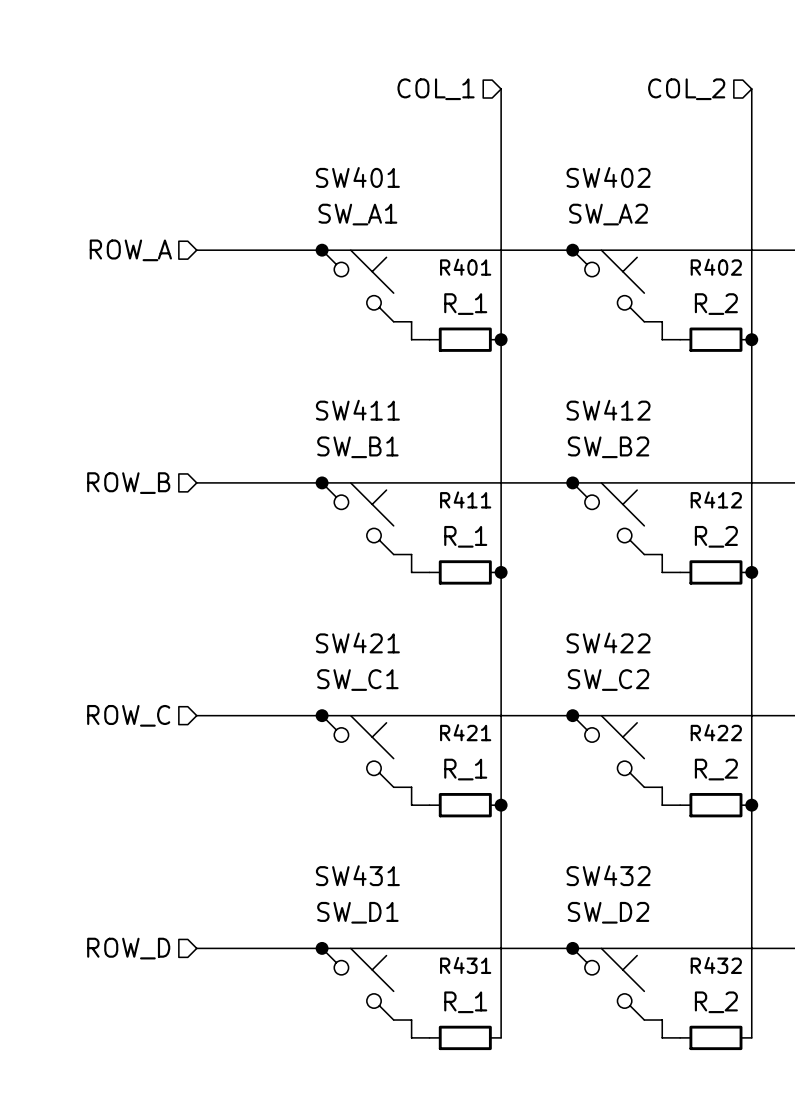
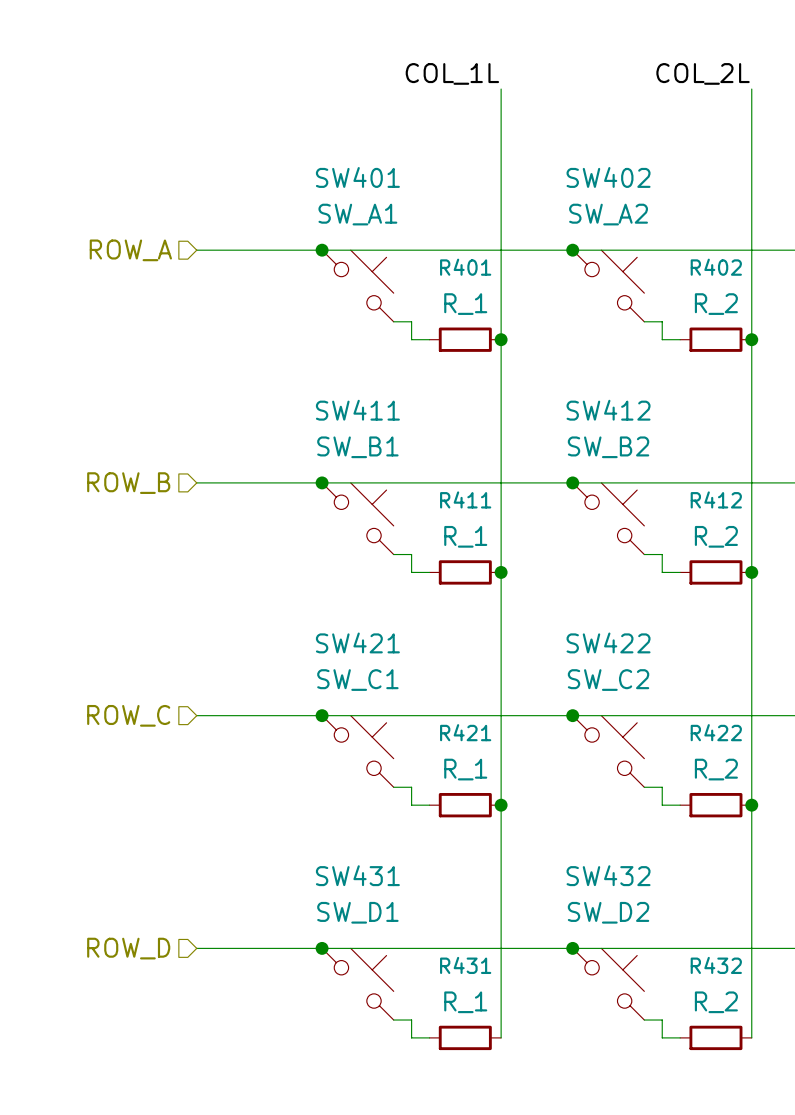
label: none -> COL_1L (452, 73)
label: none -> COL_2L (703, 73)
hierarchical label: COL_1 (436, 89) -> none
hierarchical label: COL_2 (686, 89) -> none

